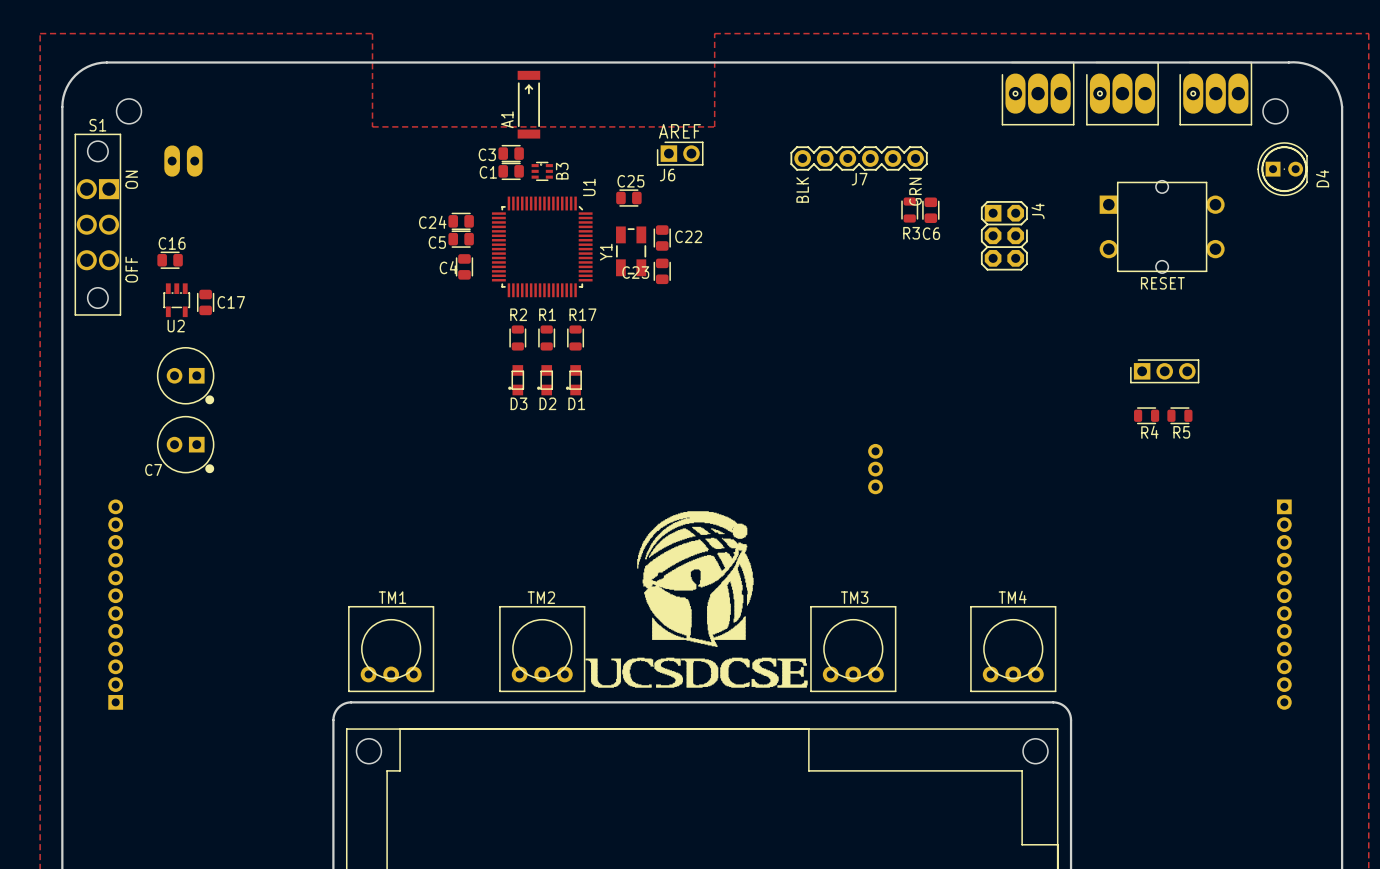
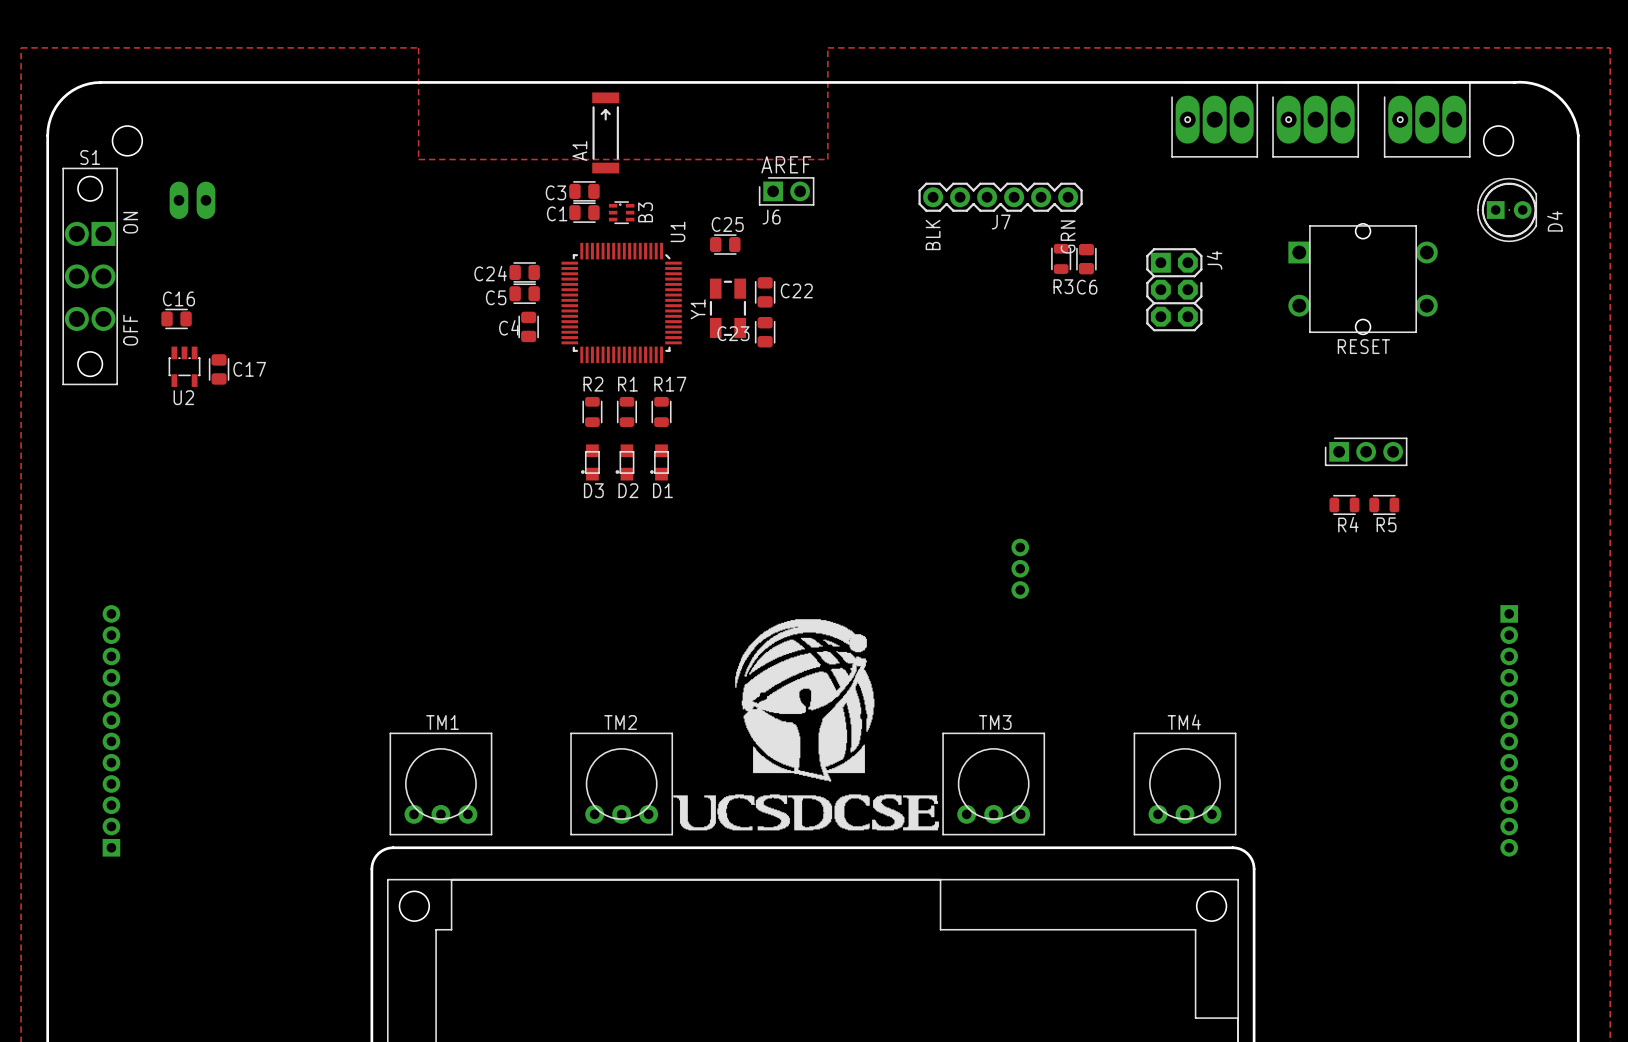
part: (185, 375) -> none
C7: (185, 444) -> none

